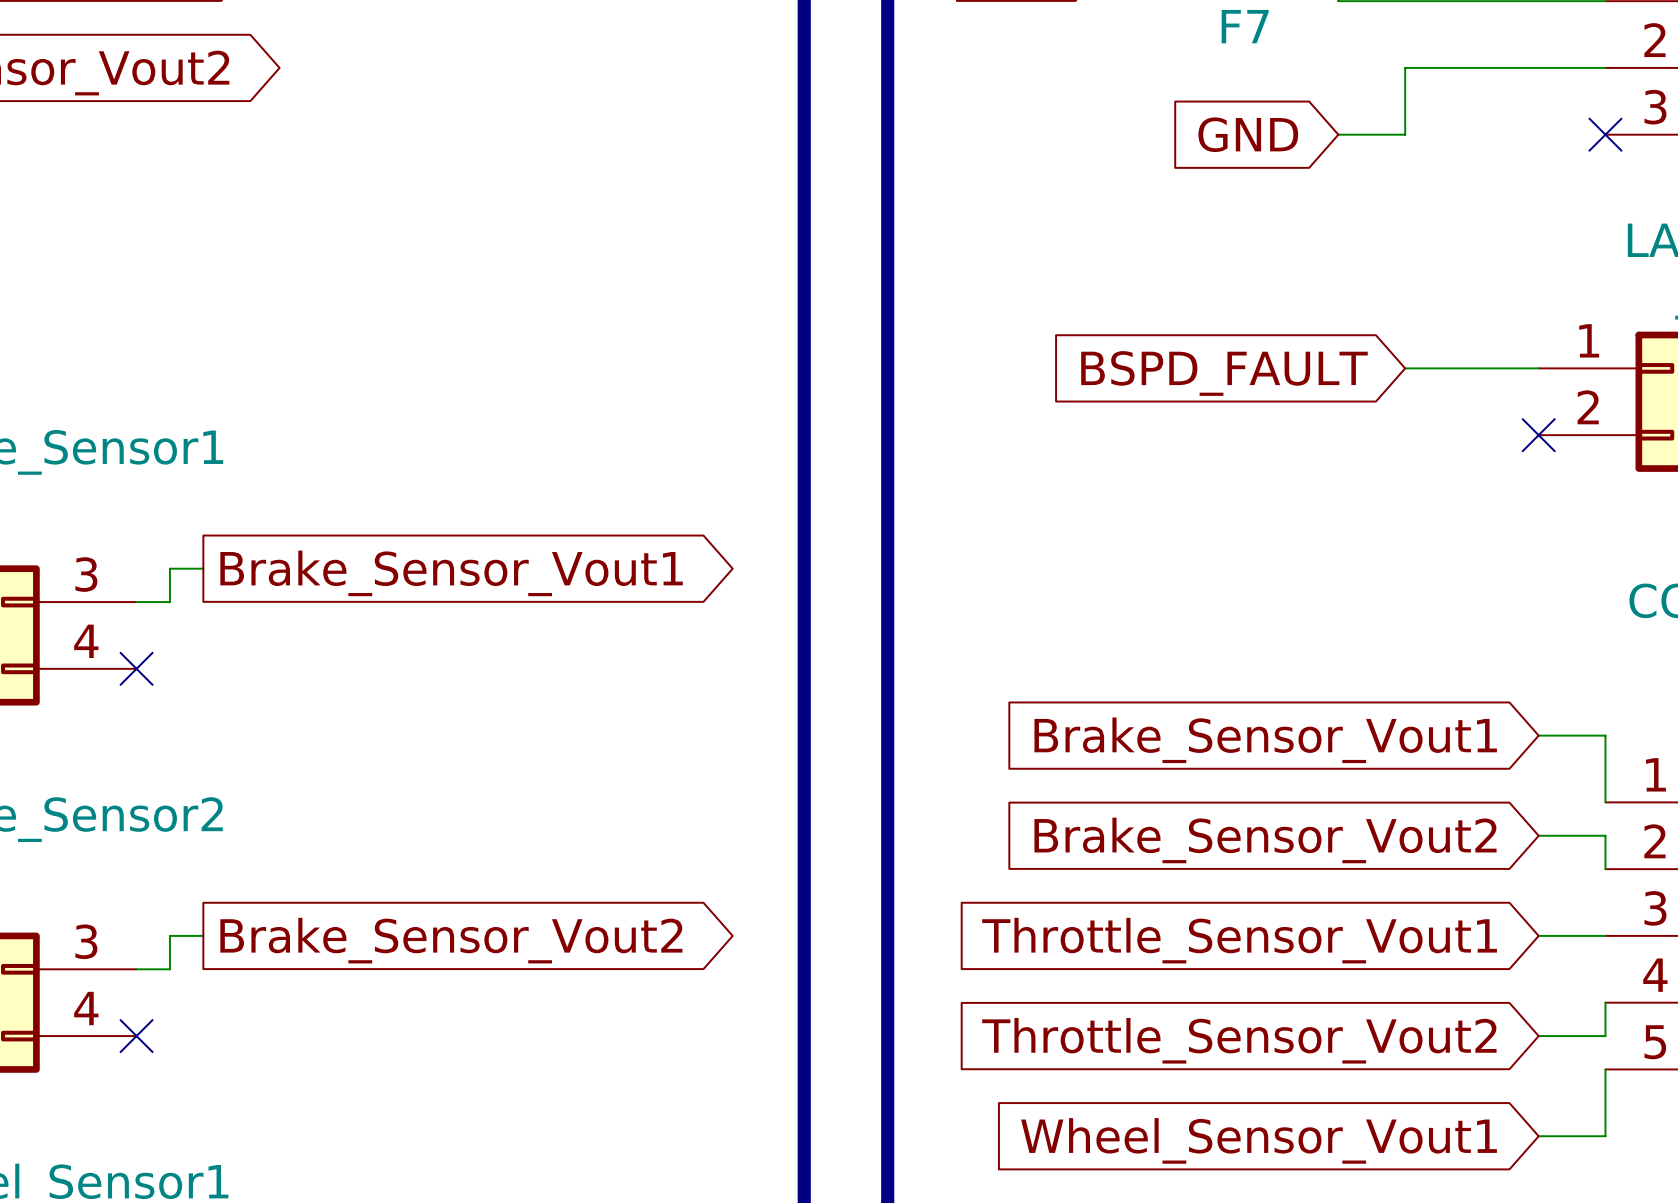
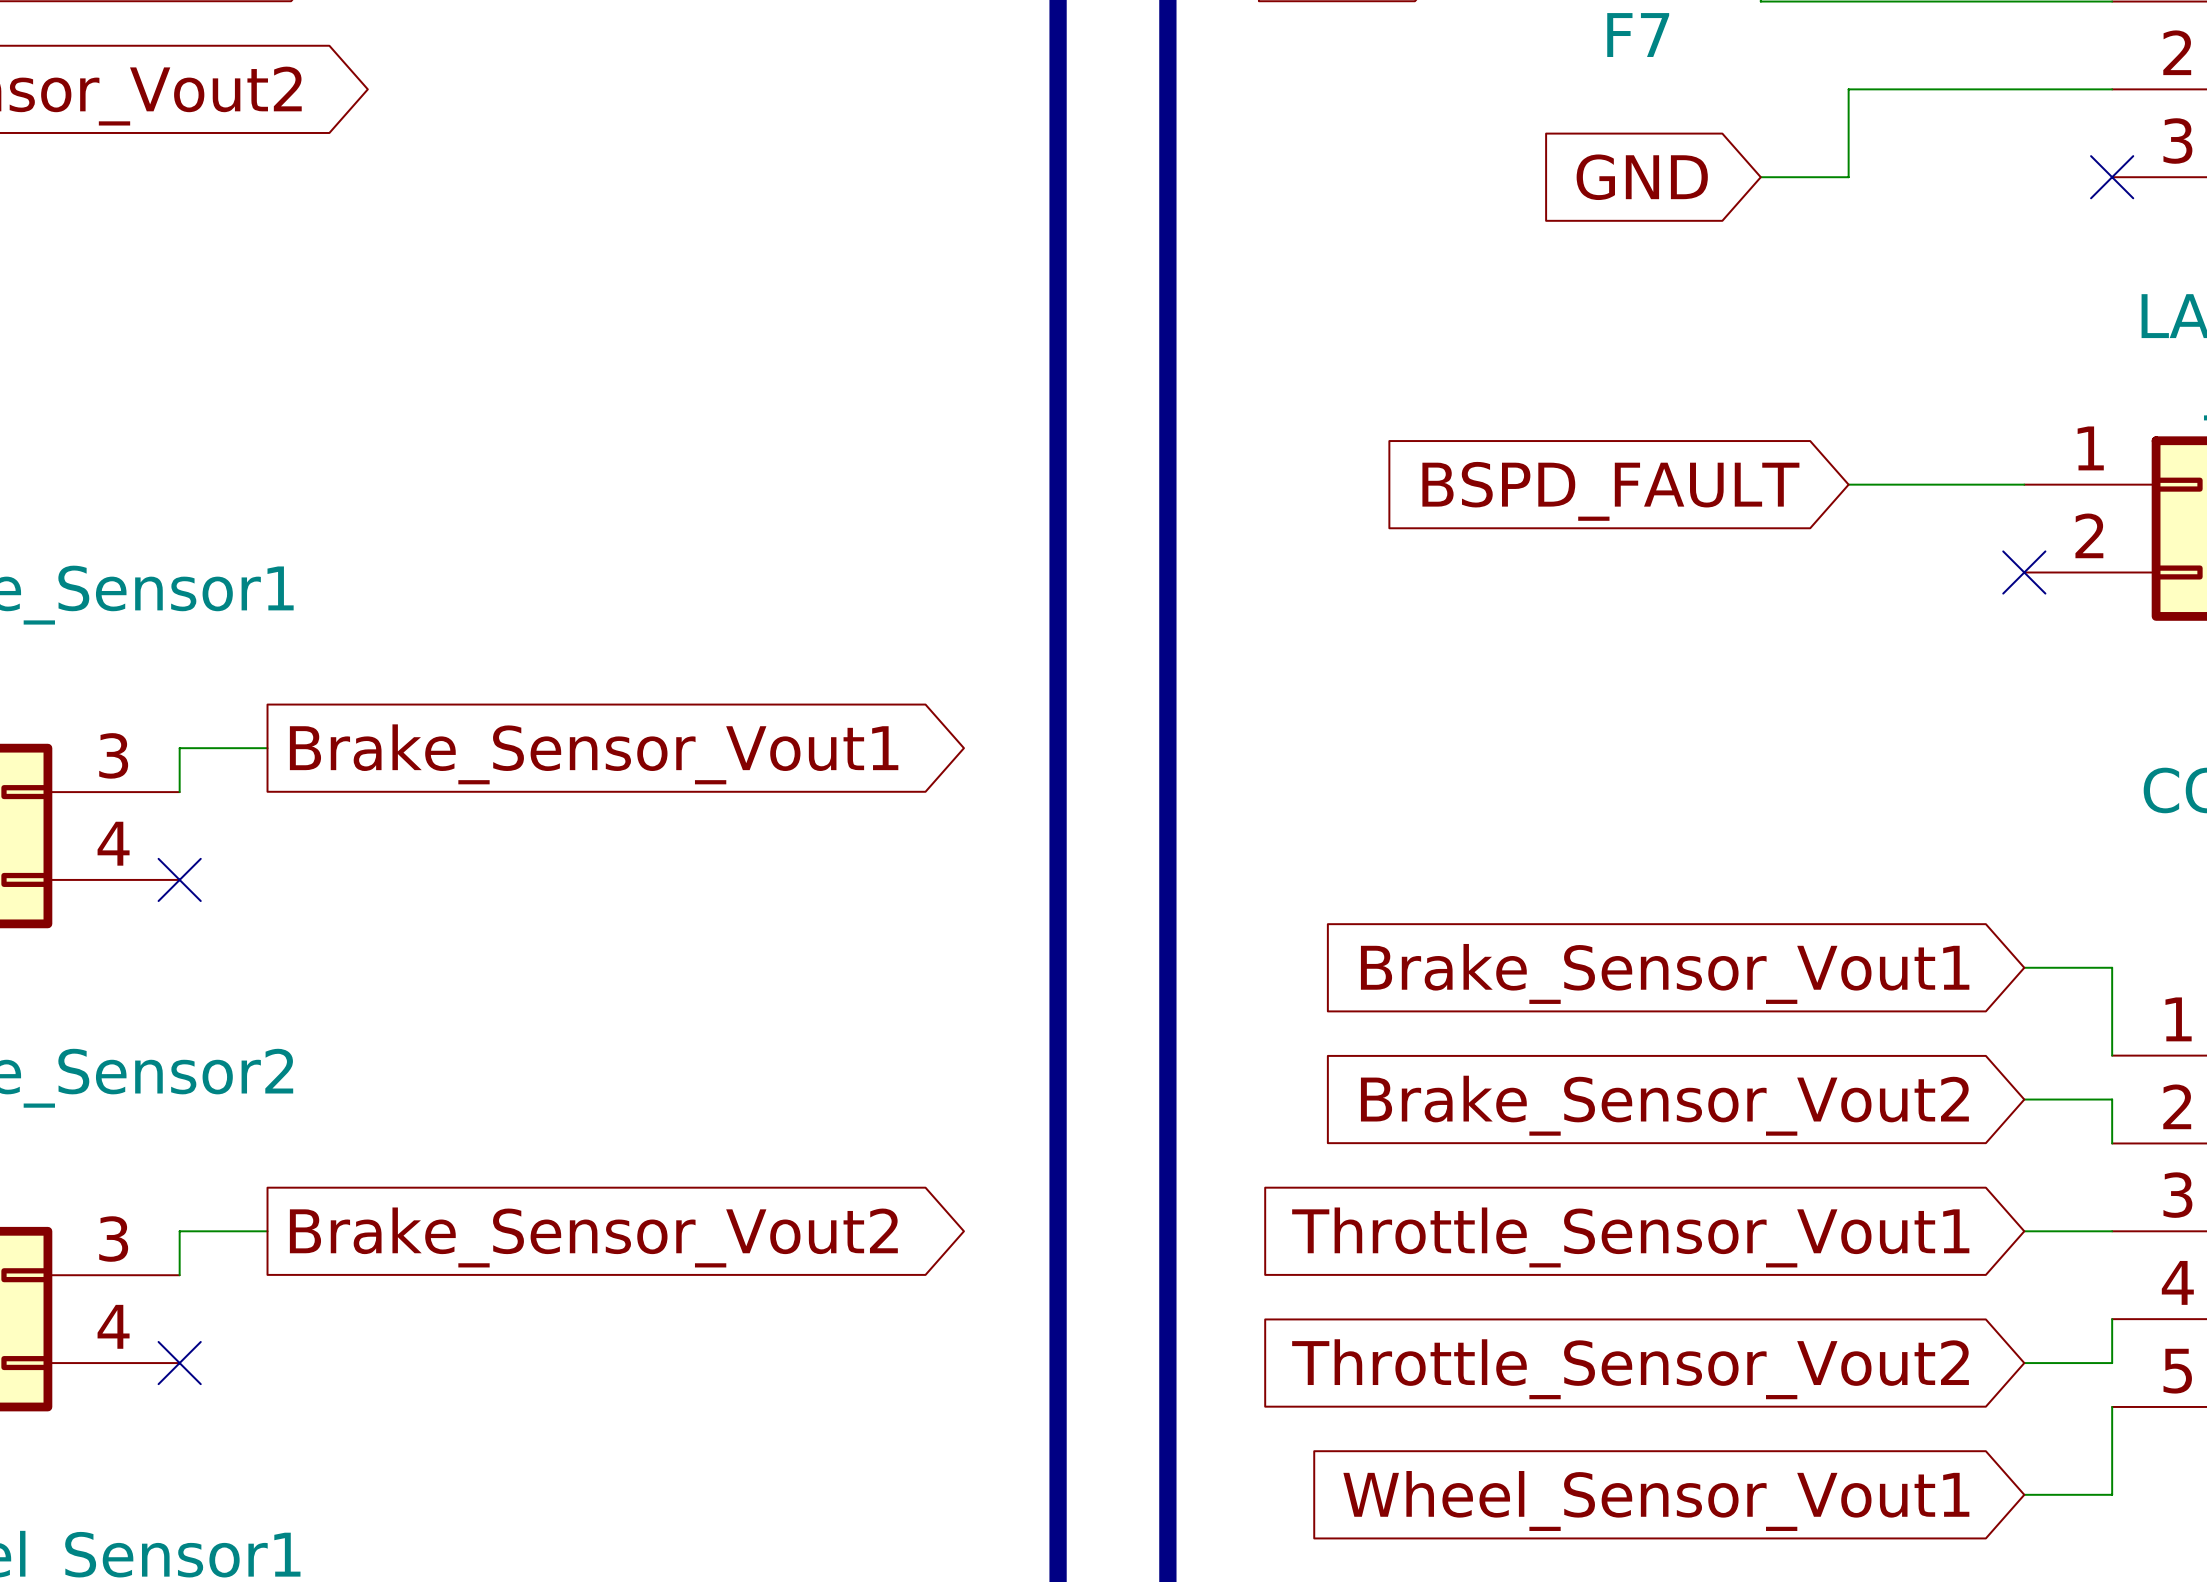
wire: (169, 568) (169, 602) (136, 602) -> (223, 748) (179, 748) (179, 792)
wire: (169, 935) (169, 969) (136, 969) -> (223, 1231) (179, 1231) (179, 1275)

